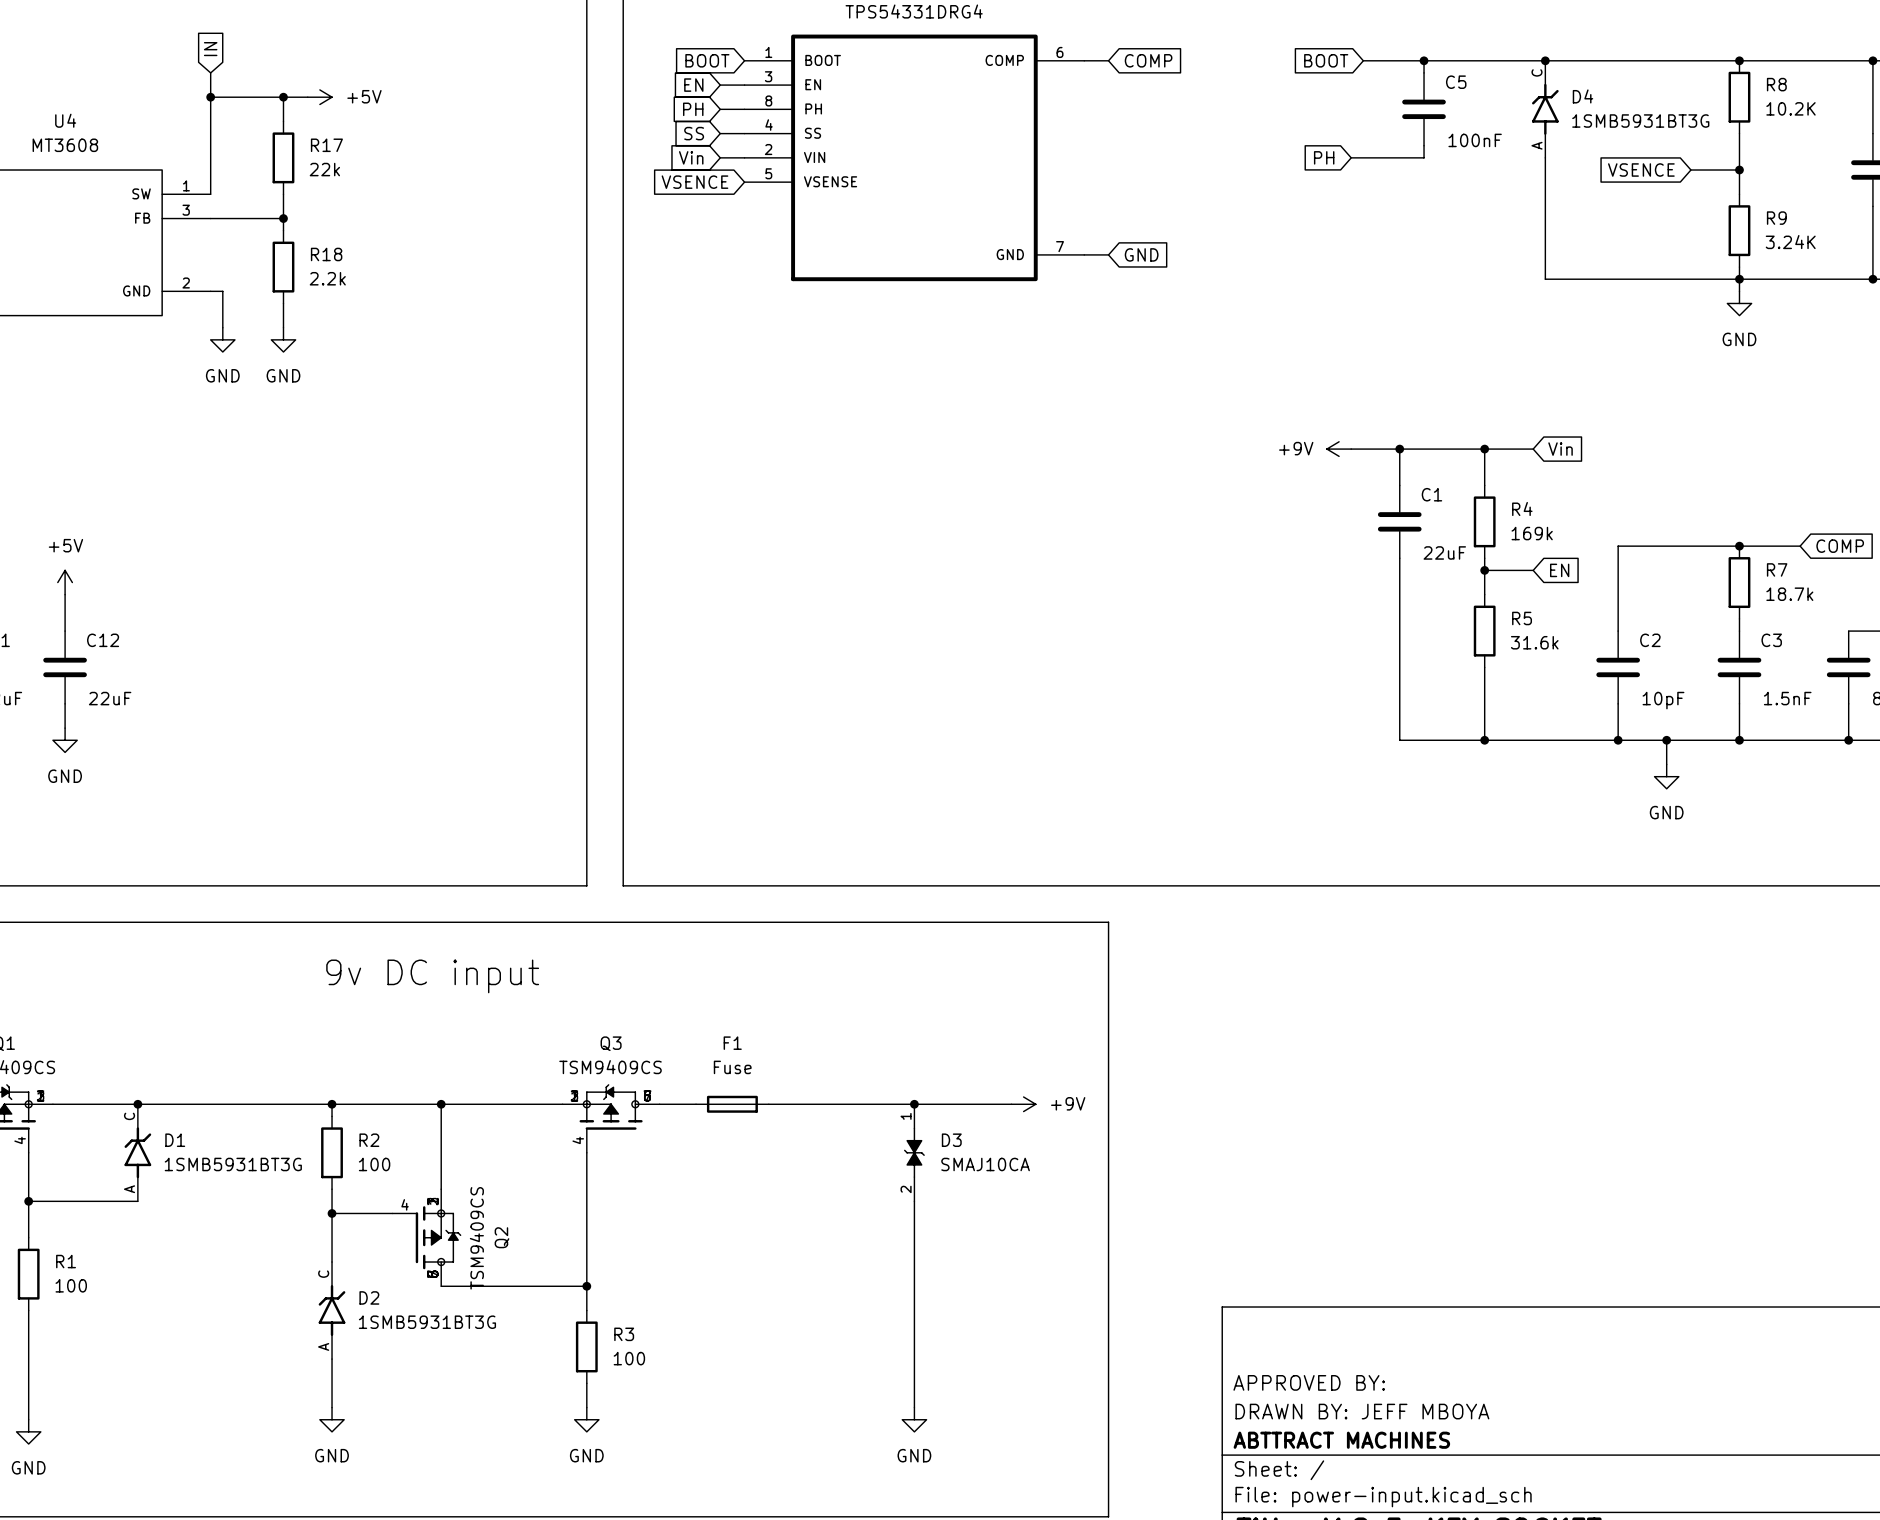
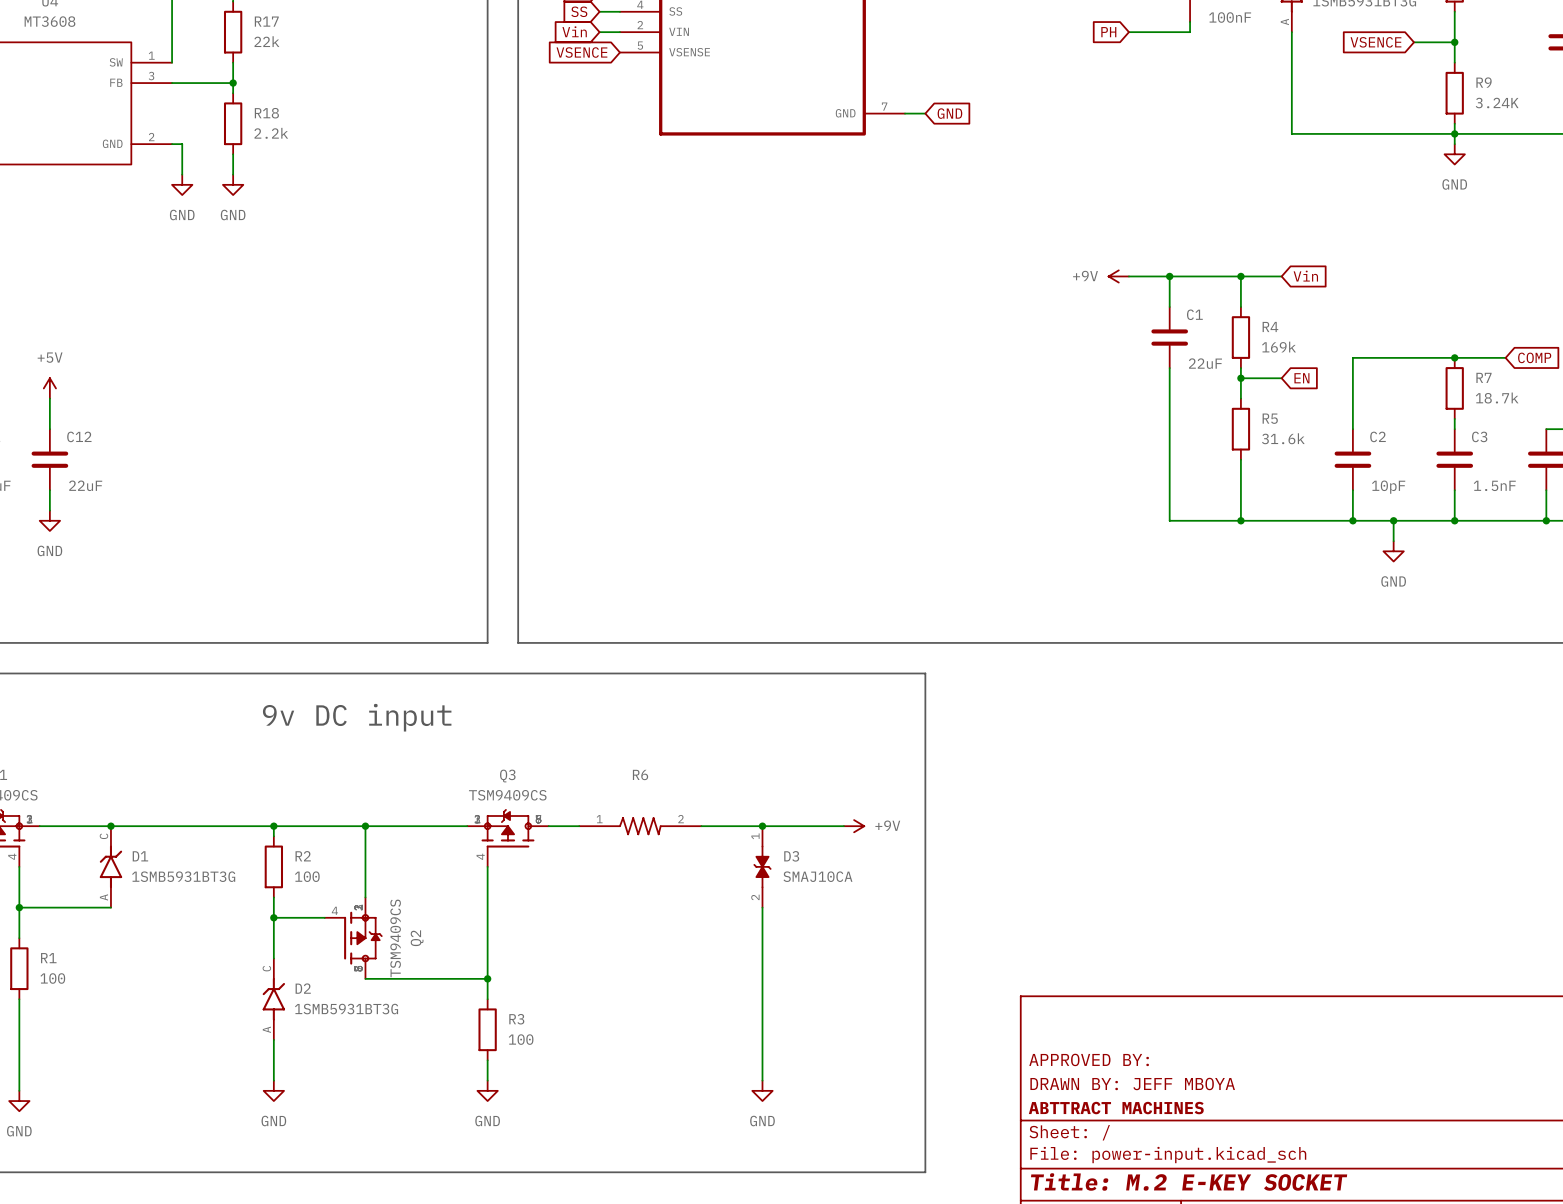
F1: Fuse (732, 1104) -> none
R6: none -> (640, 826)

